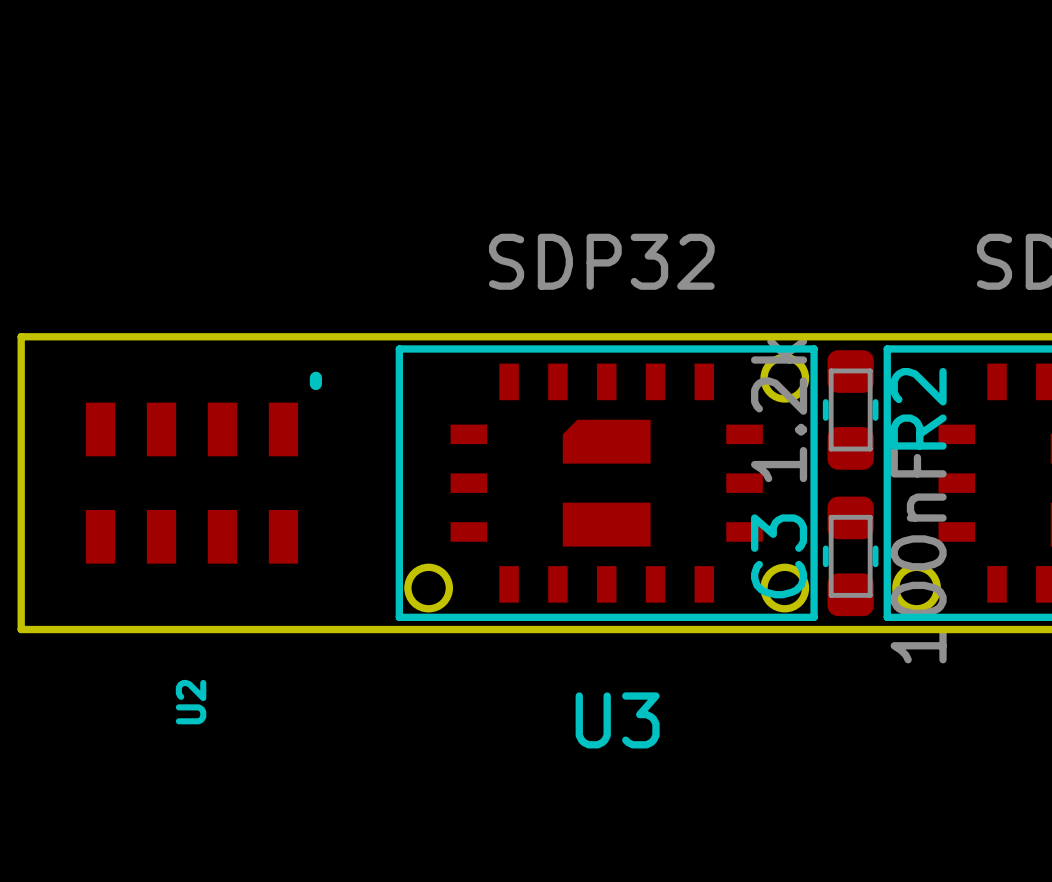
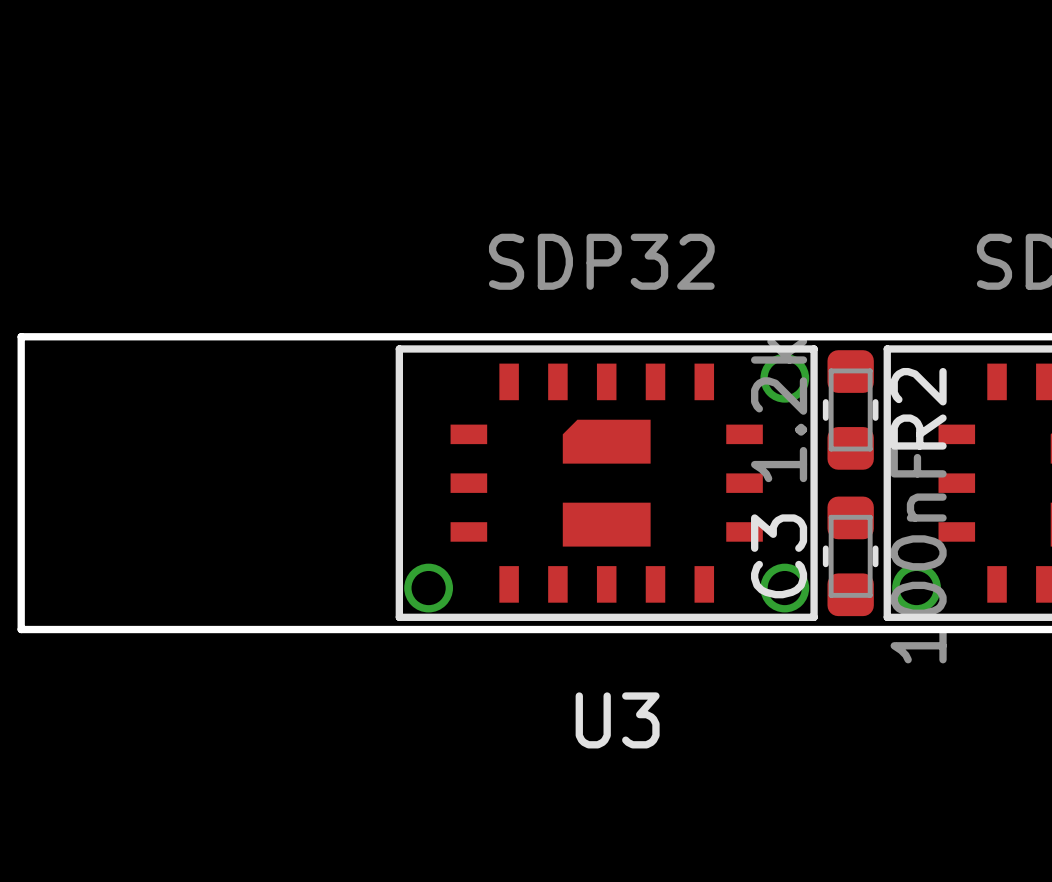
U2: (203, 467) -> none

